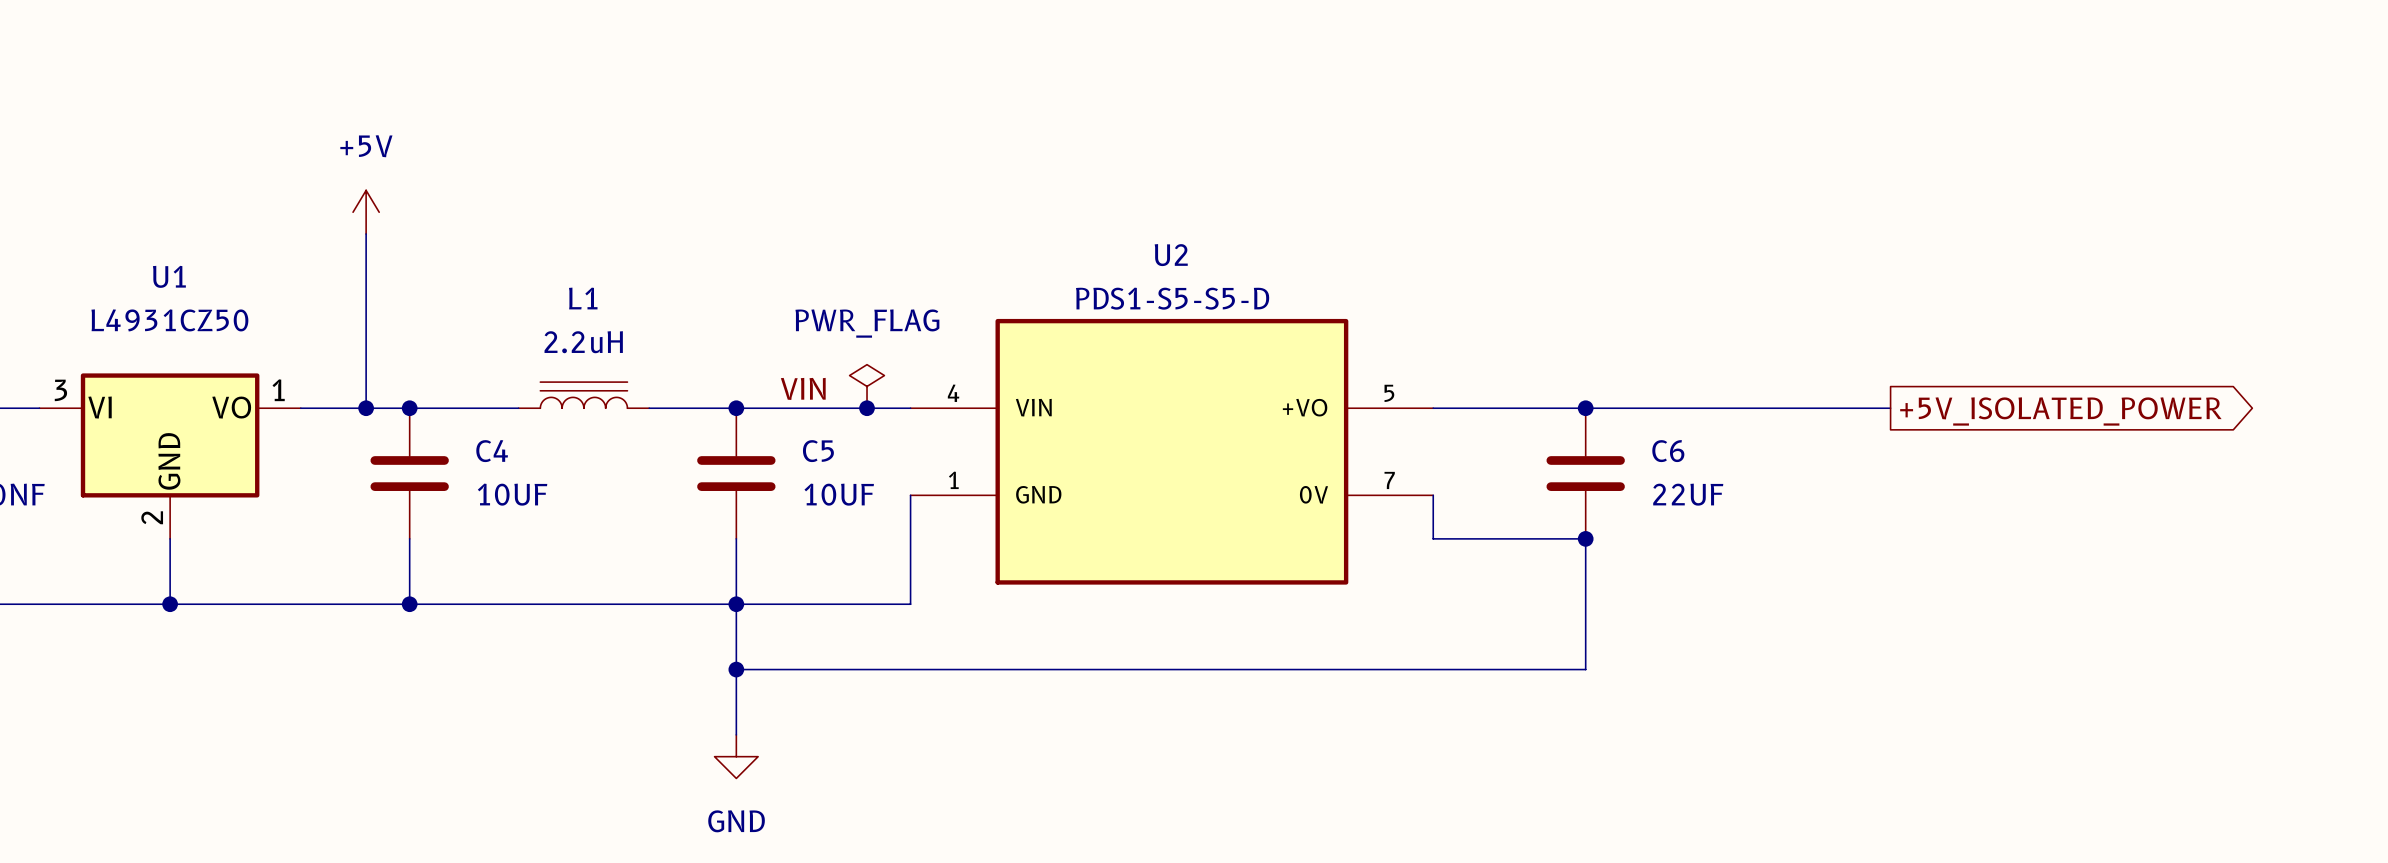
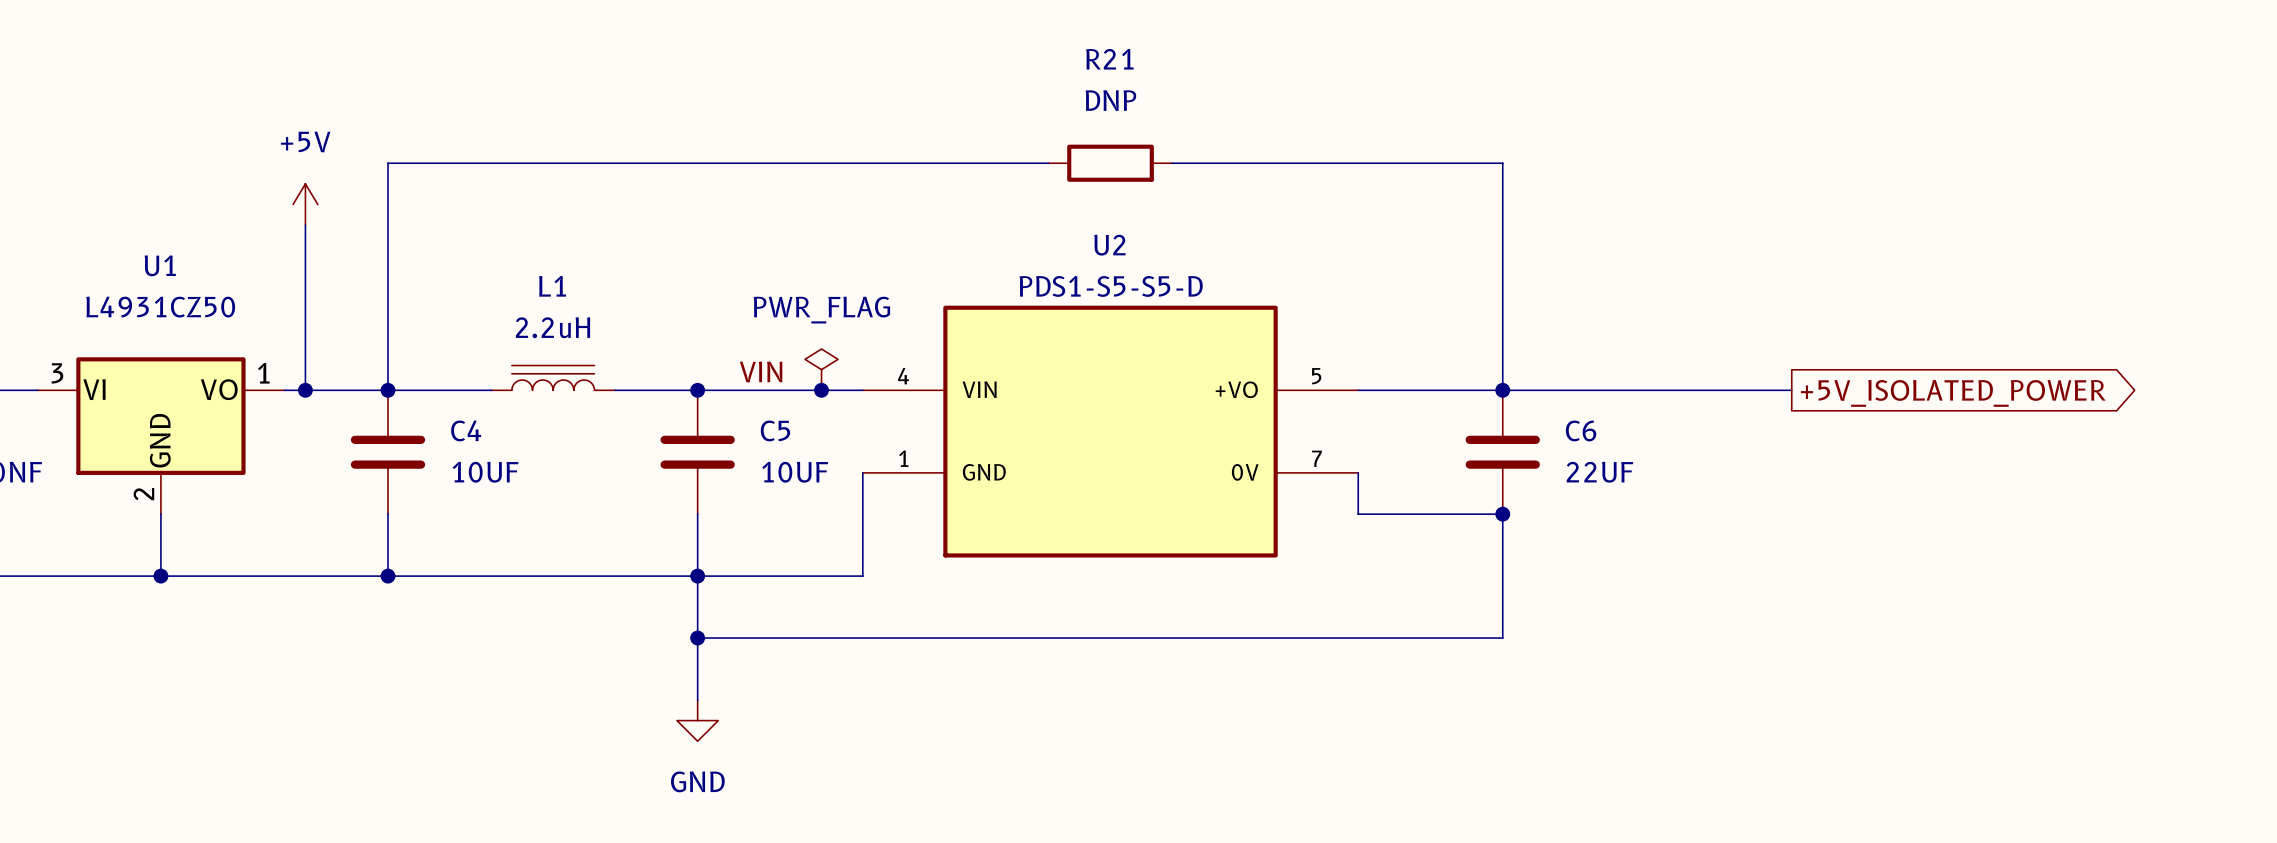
wire: none -> (1048, 163) (388, 163) (388, 390)
R21: none -> DNP (1110, 163)
wire: none -> (1172, 163) (1502, 163) (1502, 390)
power symbol position: +5V (366, 212) -> +5V (305, 204)
wire: (366, 234) (366, 408) -> (305, 225) (305, 390)
junction position: (366, 408) -> (305, 390)

